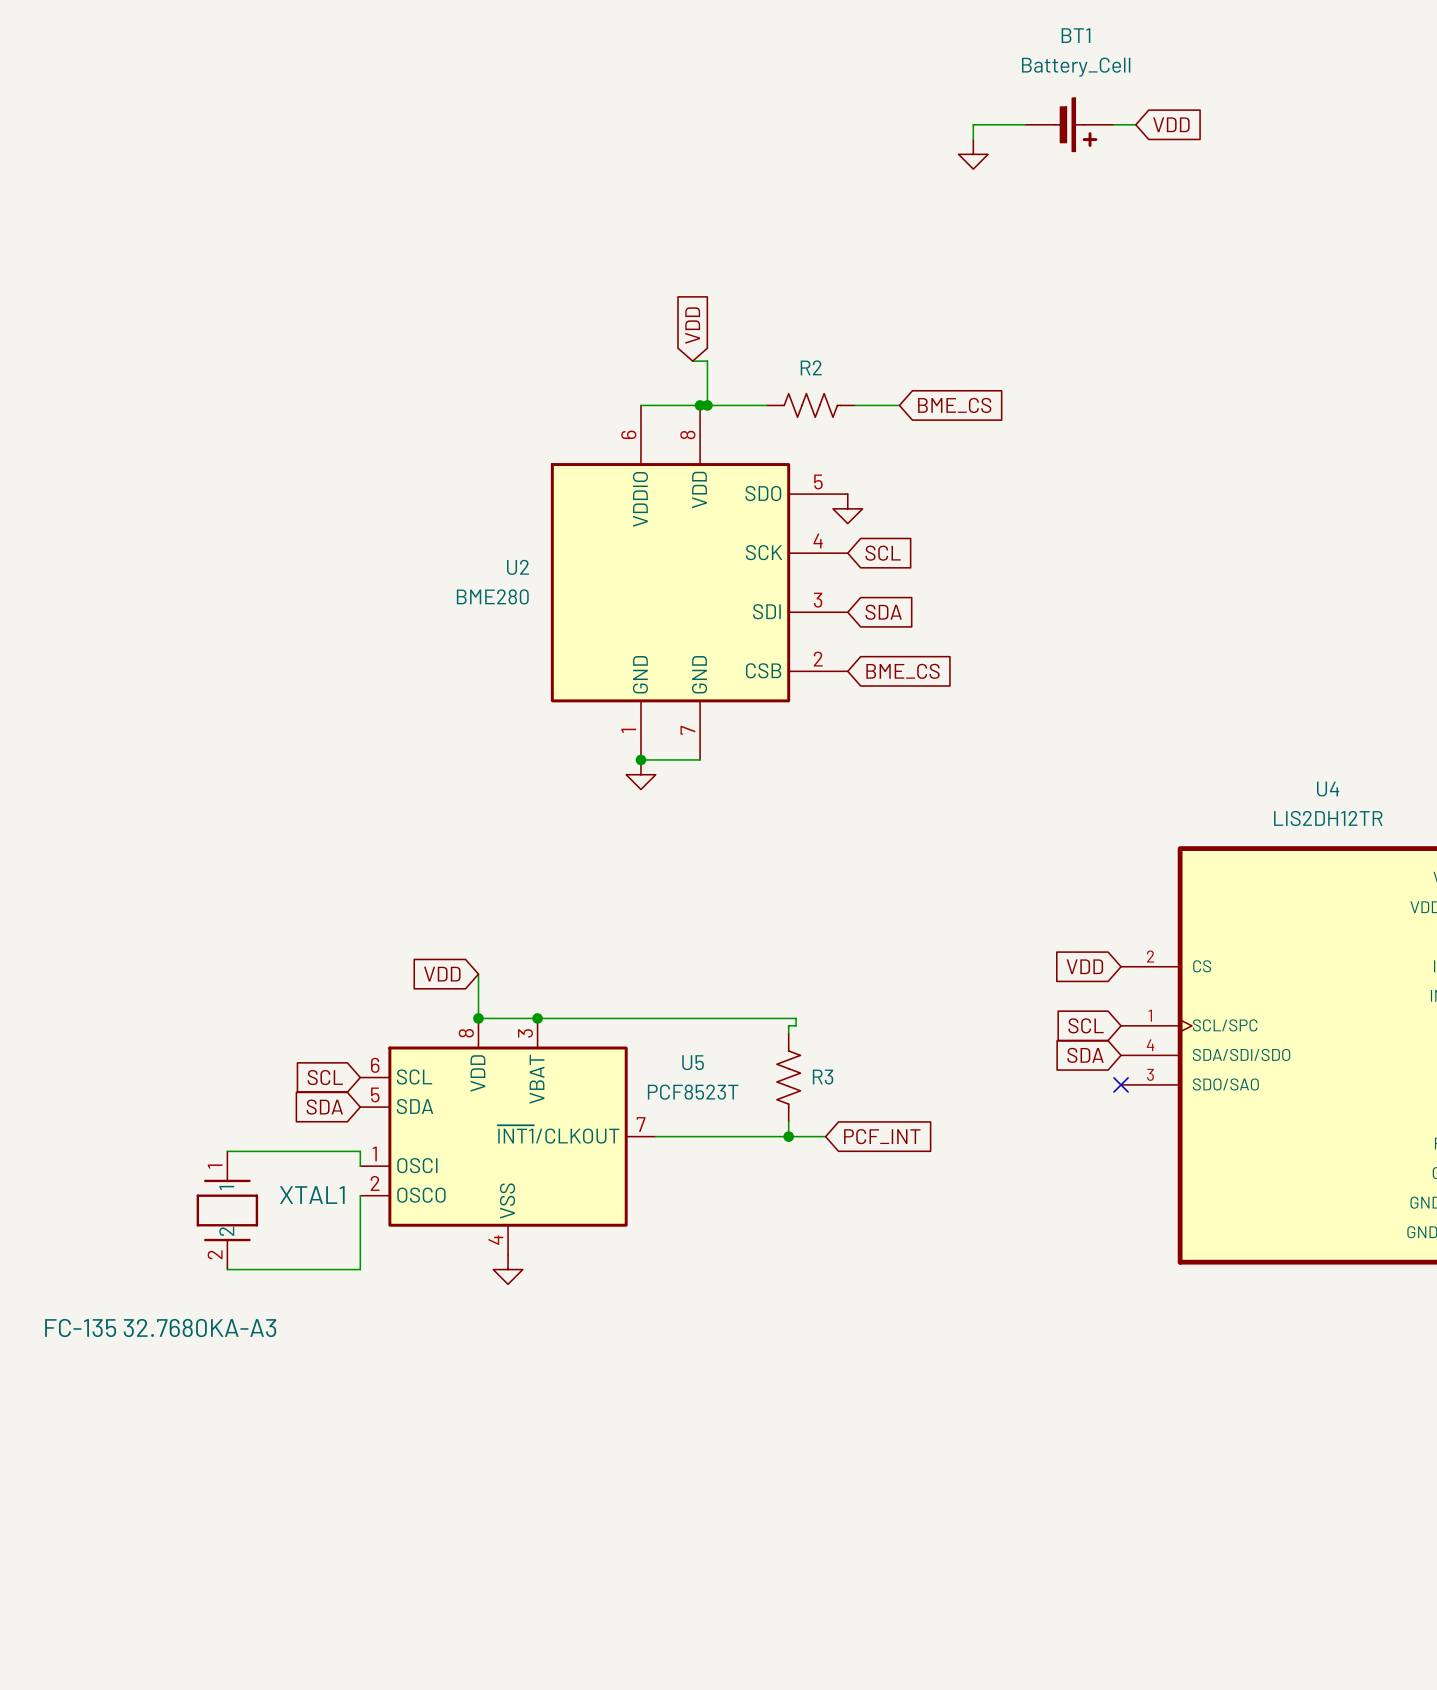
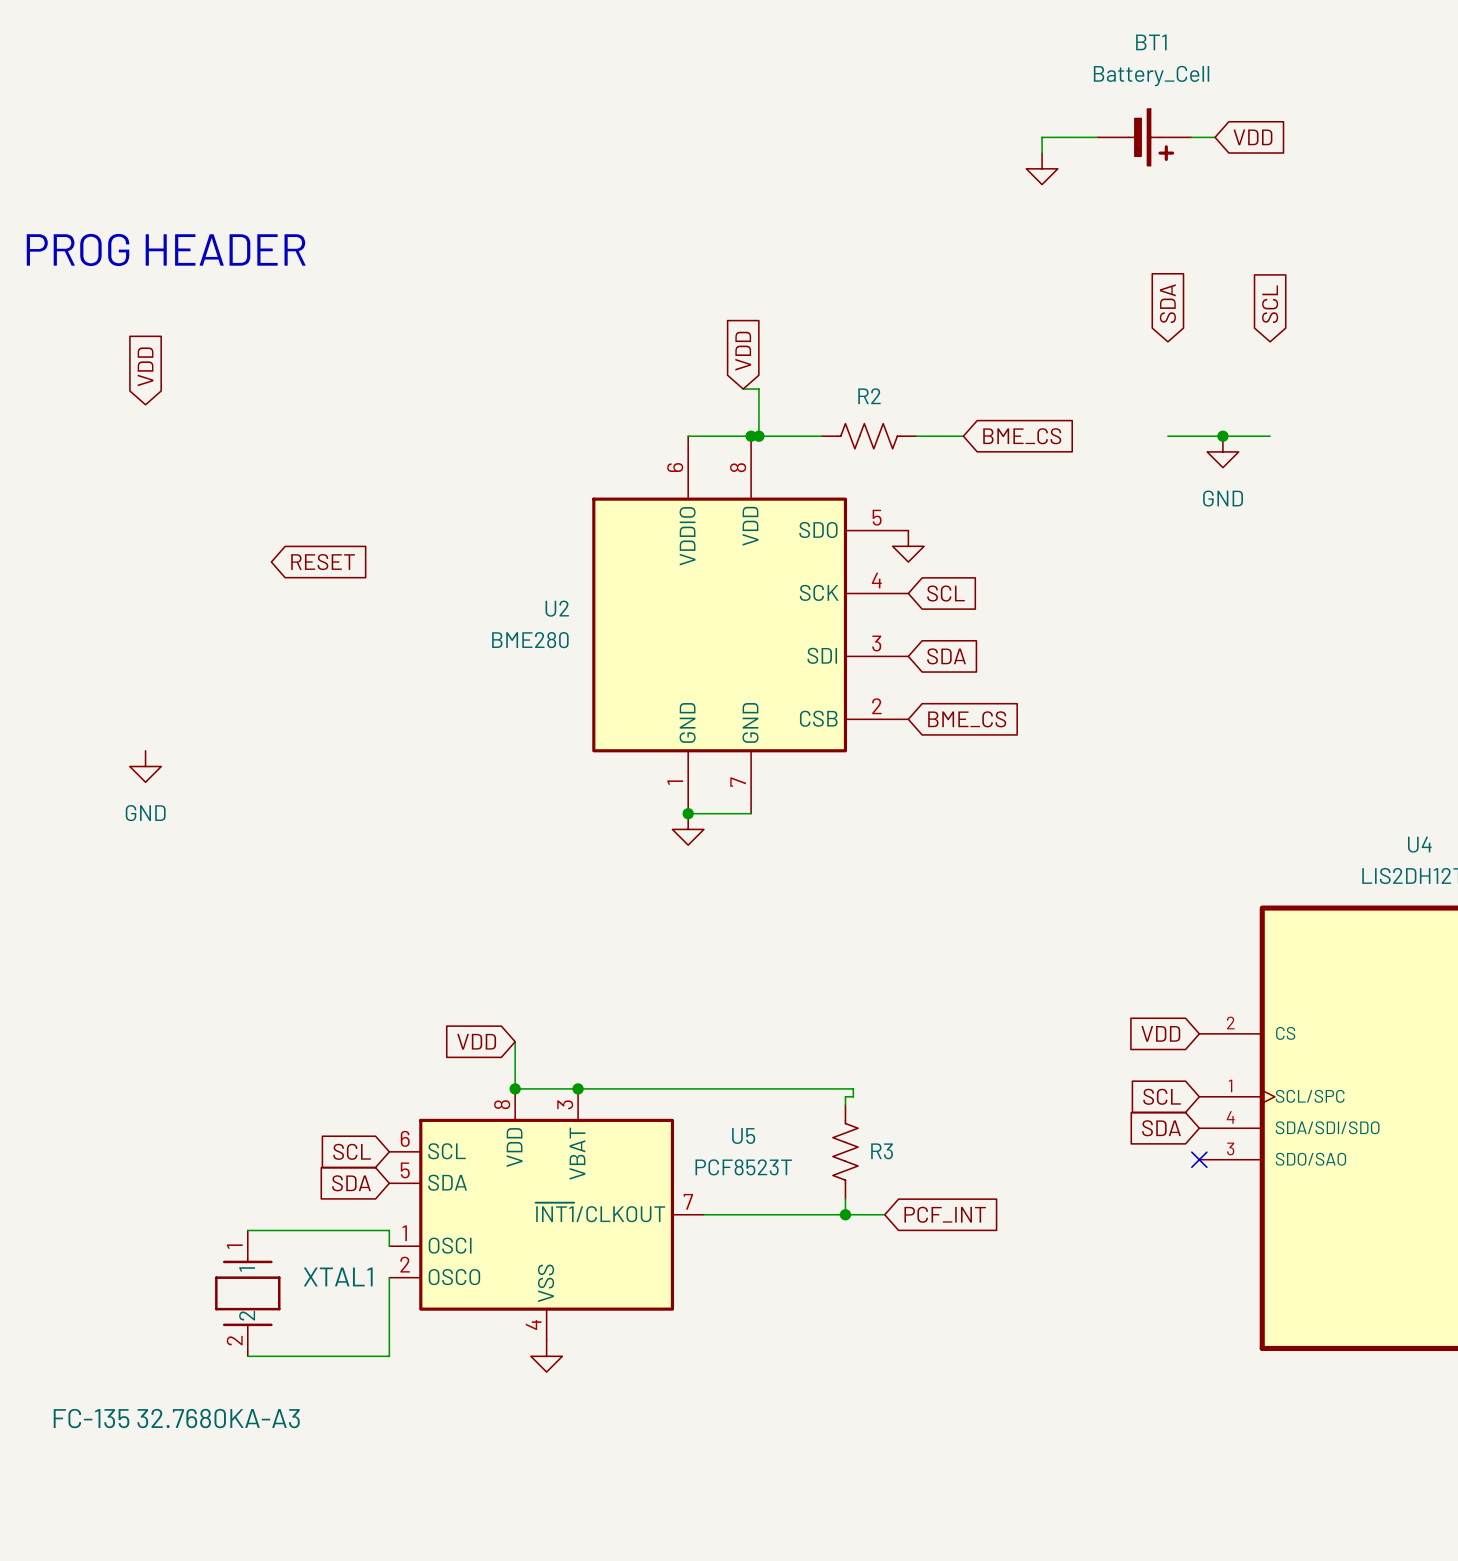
text: none -> PROG HEADER (166, 249)
global label: none -> SDA (1167, 303)
global label: none -> SCL (1270, 304)
global label: none -> VDD (145, 366)
wire: none -> (1167, 436) (1270, 436)
junction: none -> (1222, 436)
power symbol: none -> GND (1222, 451)
global label: none -> RESET (323, 562)
power symbol: none -> GND (145, 766)

